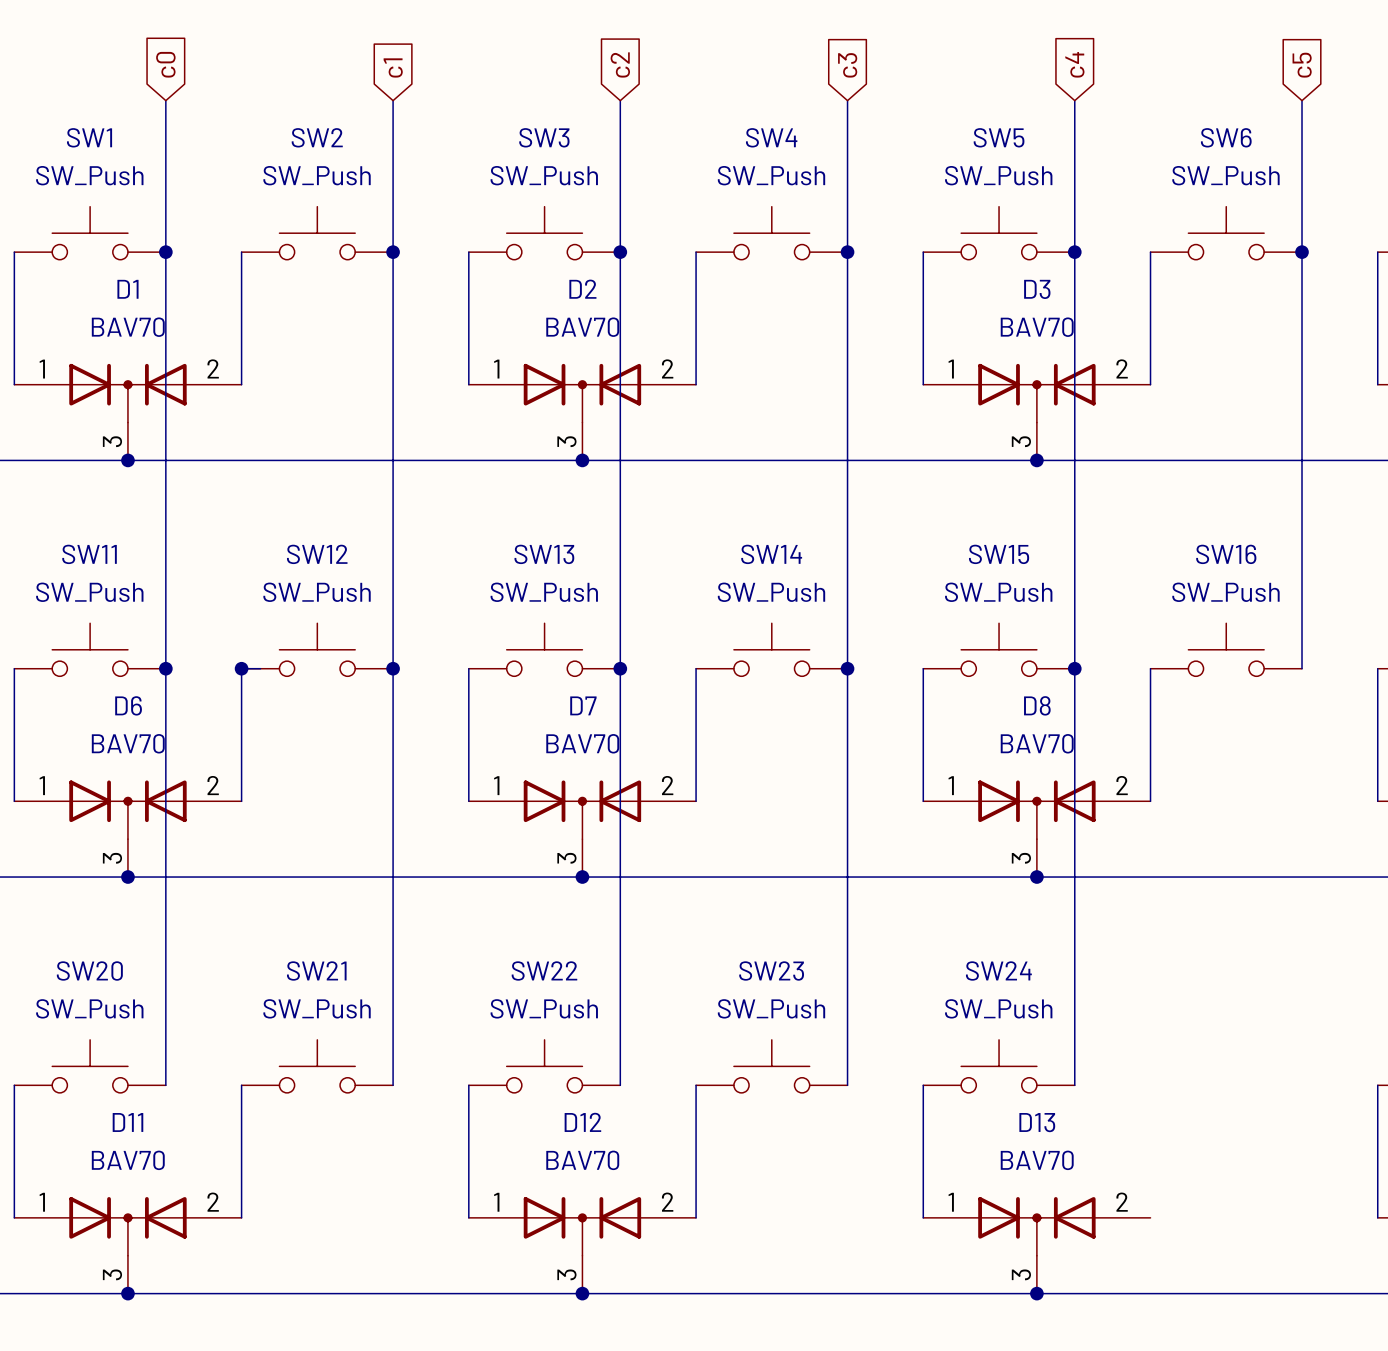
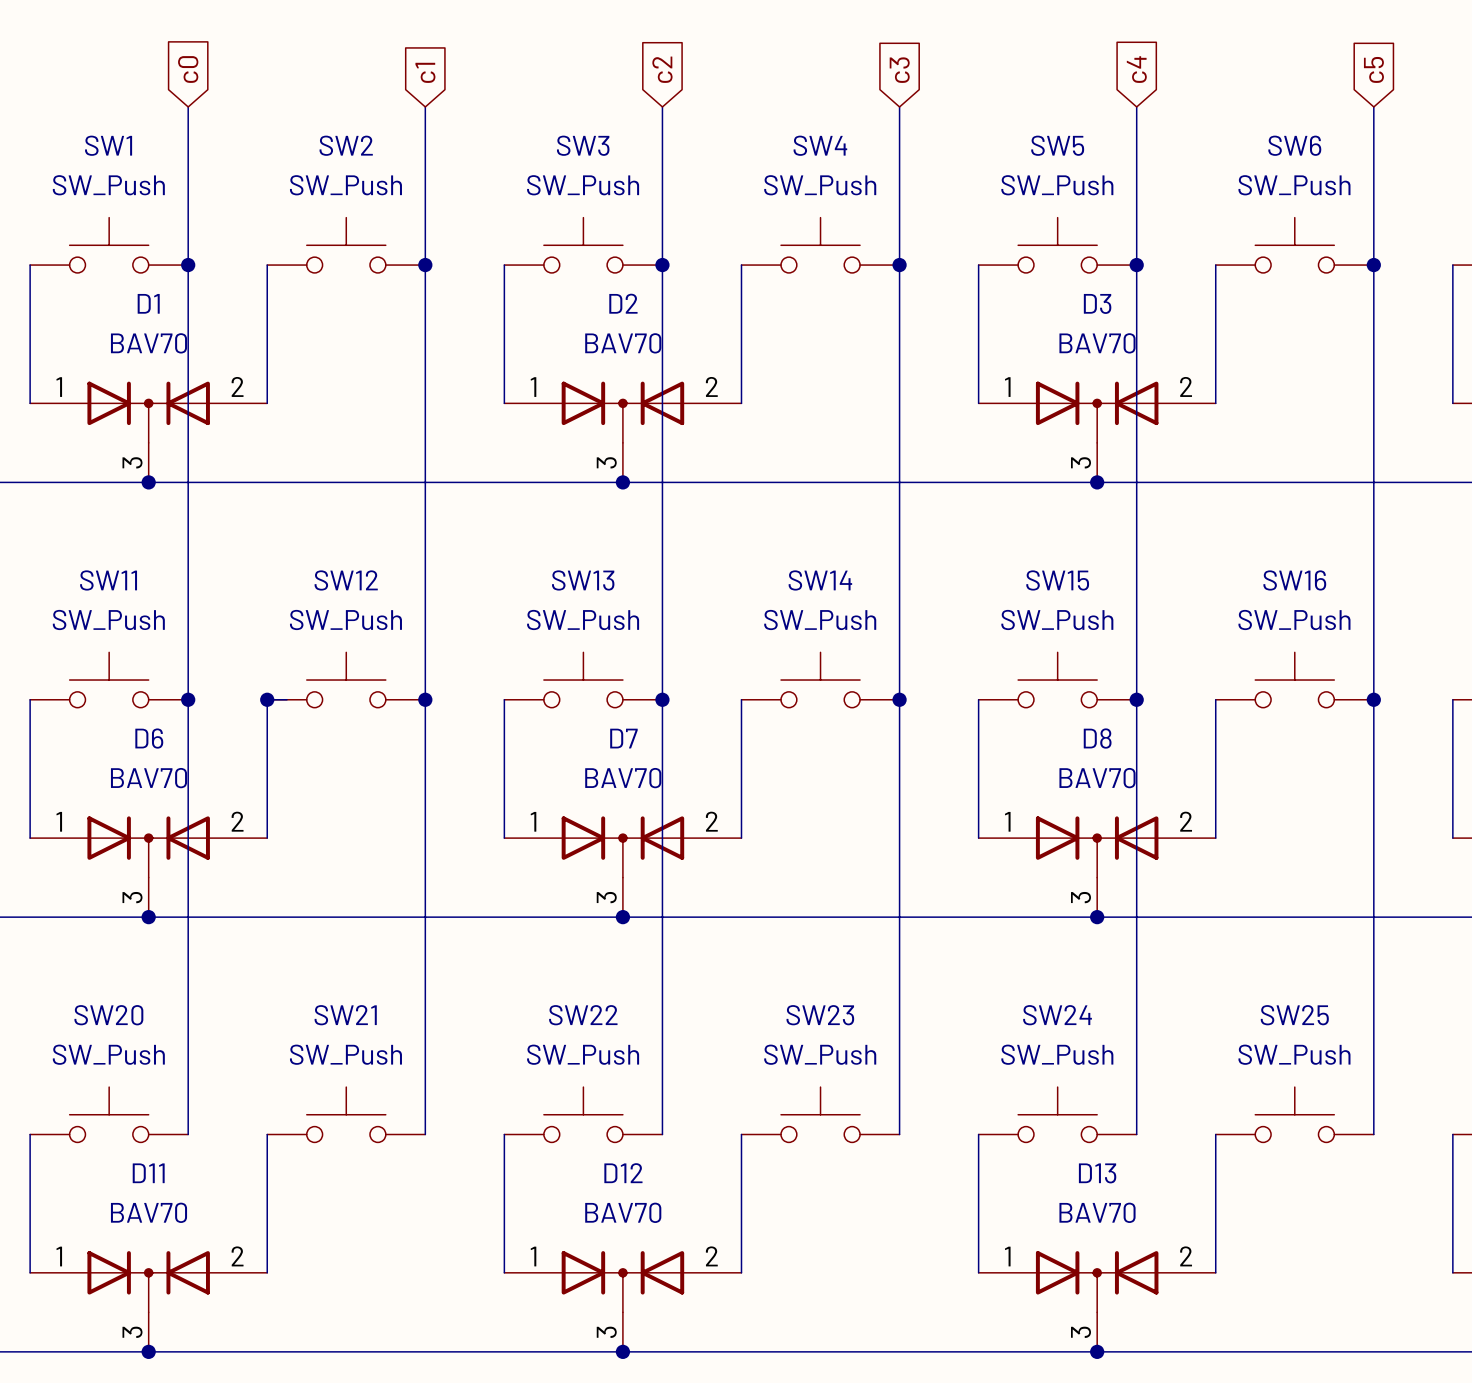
wire: none -> (1373, 699) (1373, 1134)
junction: none -> (1373, 699)
SW25: none -> SW_Push (1294, 1114)
wire: none -> (1215, 1134) (1215, 1272)

